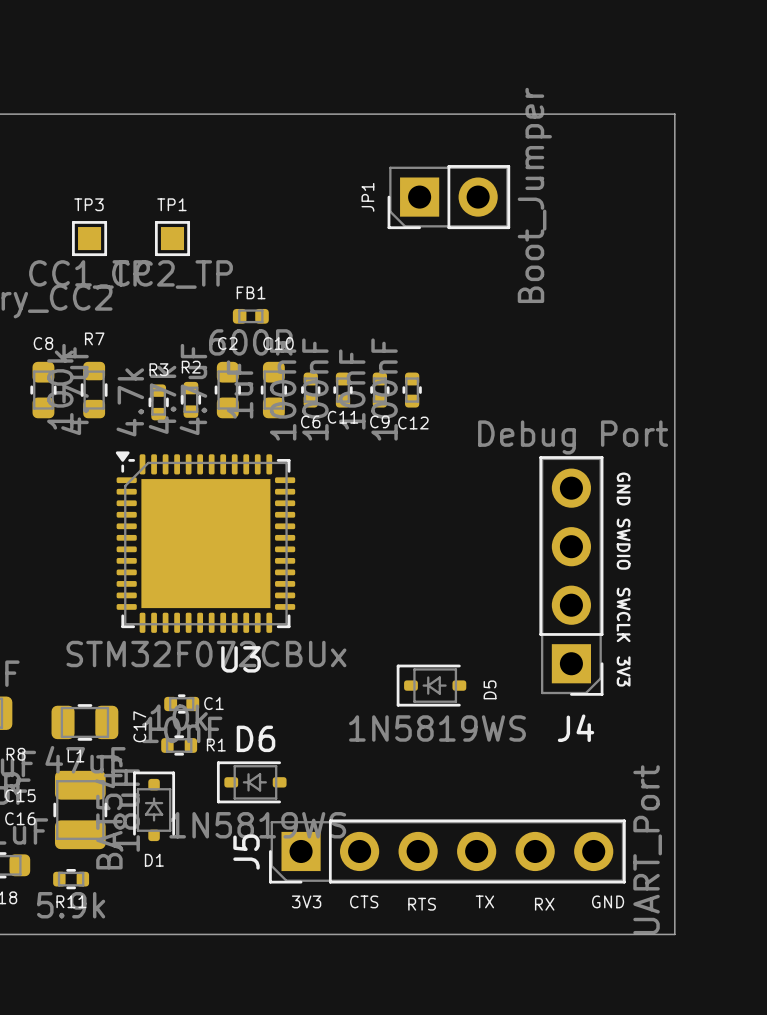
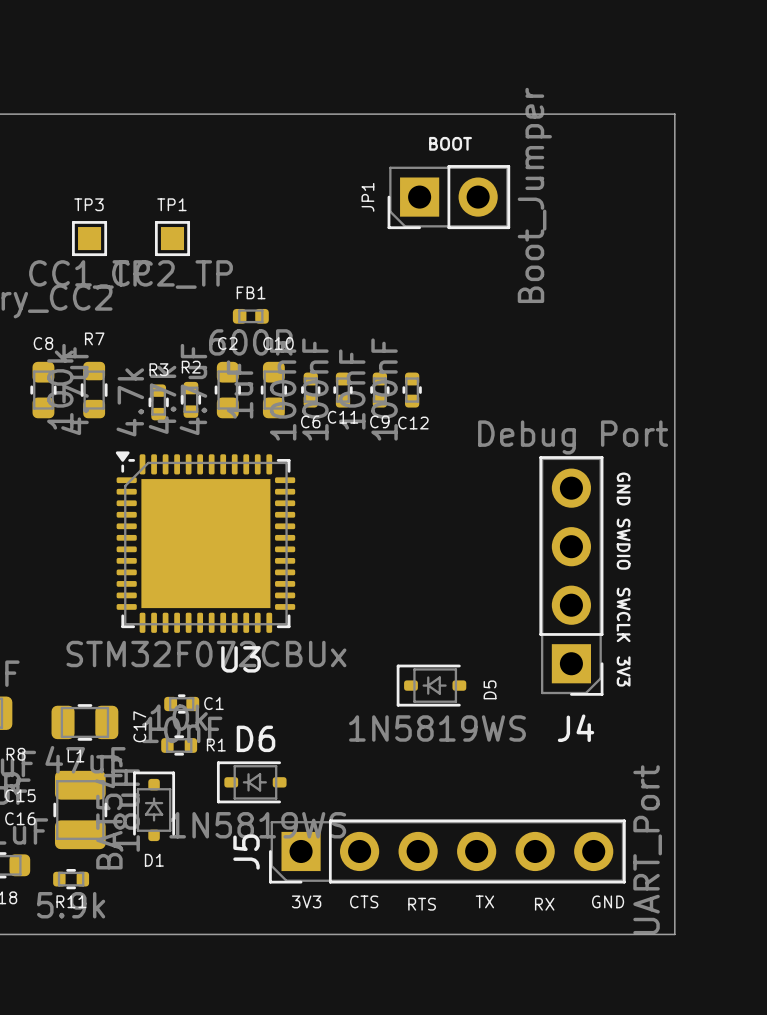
text: none -> BOOT (450, 143)

